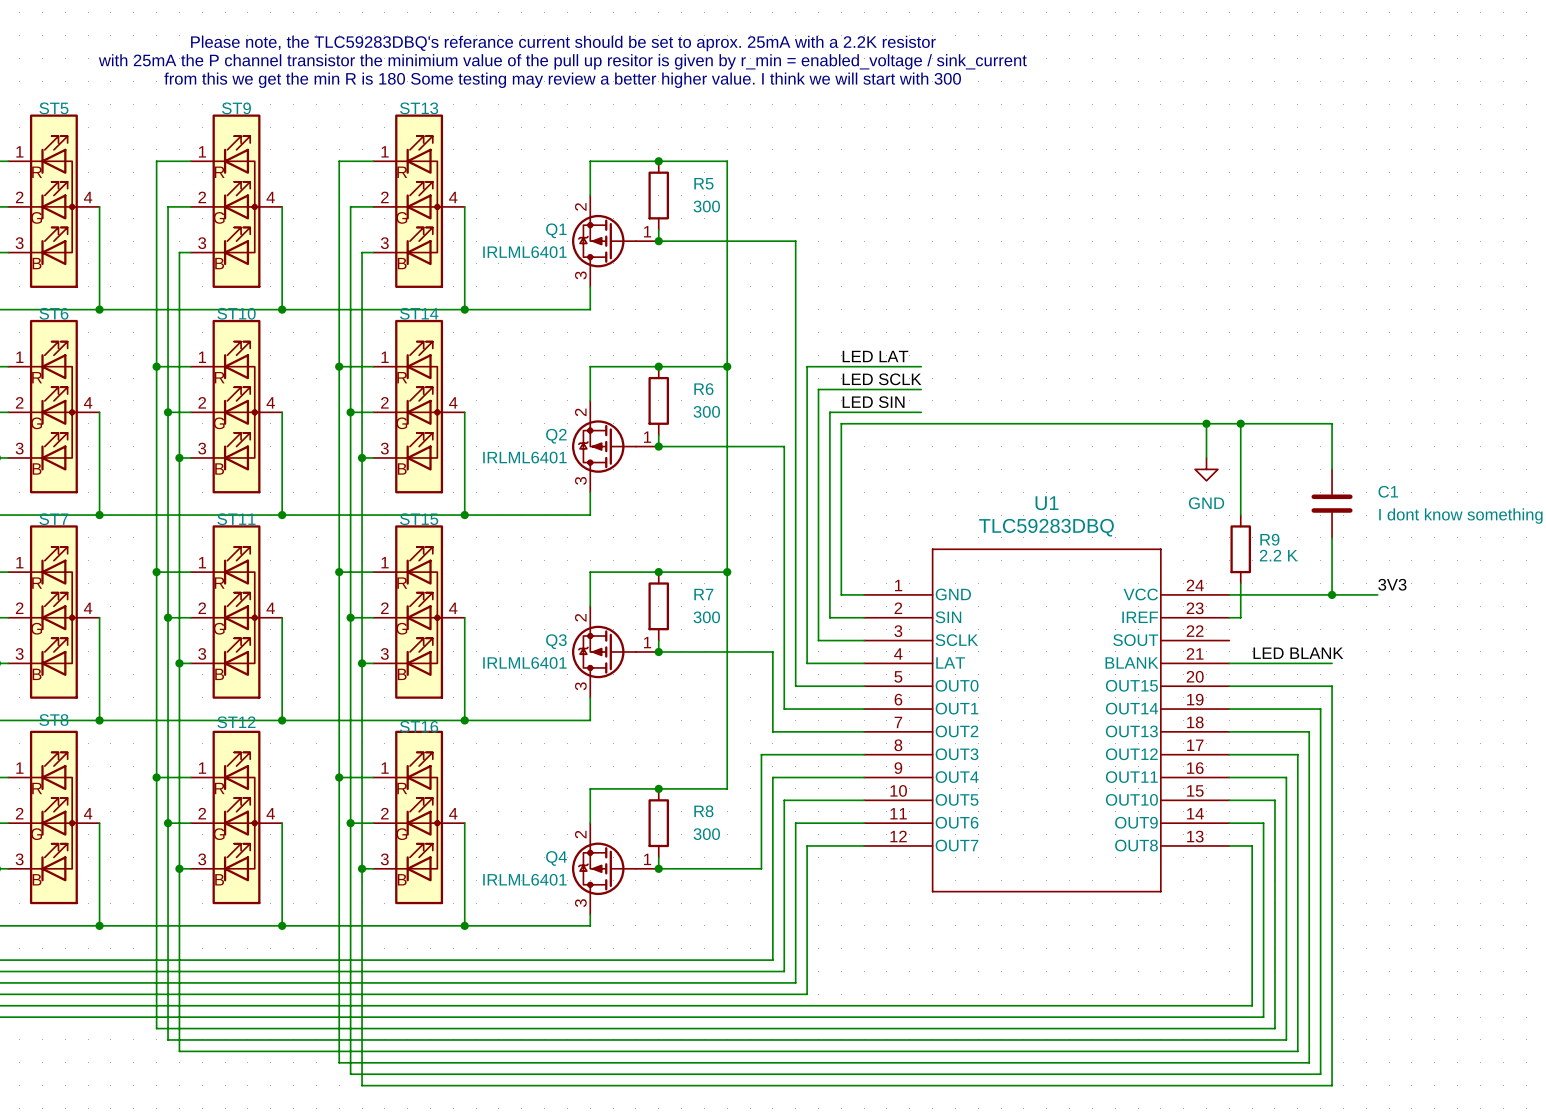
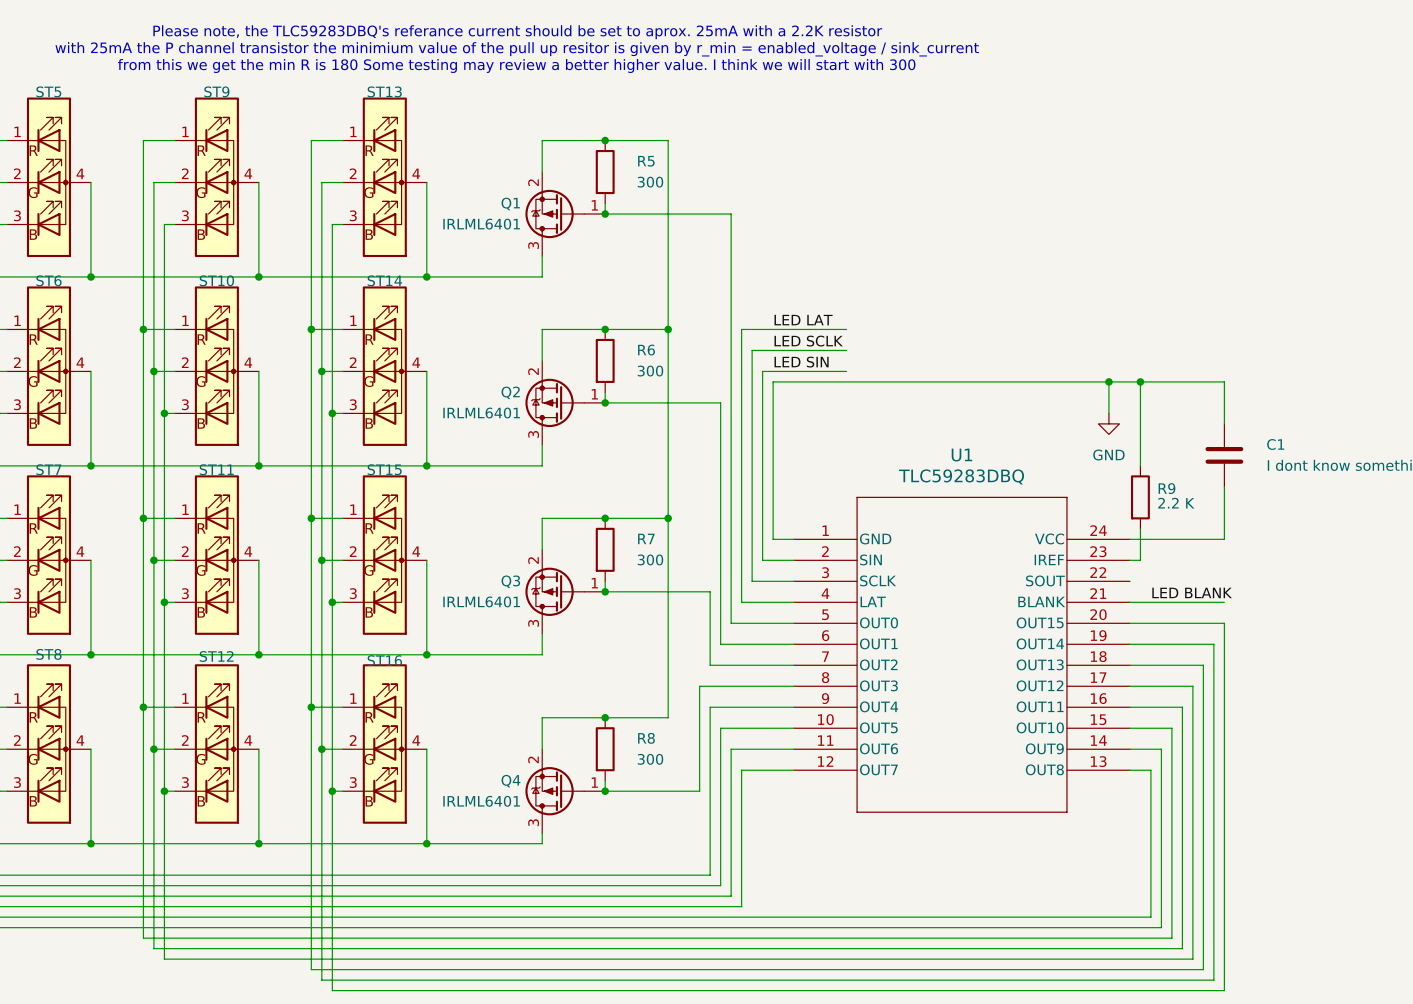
label: 3V3 (1392, 584) -> none
wire: (1332, 594) (1377, 594) -> none
junction: (1332, 594) -> none

